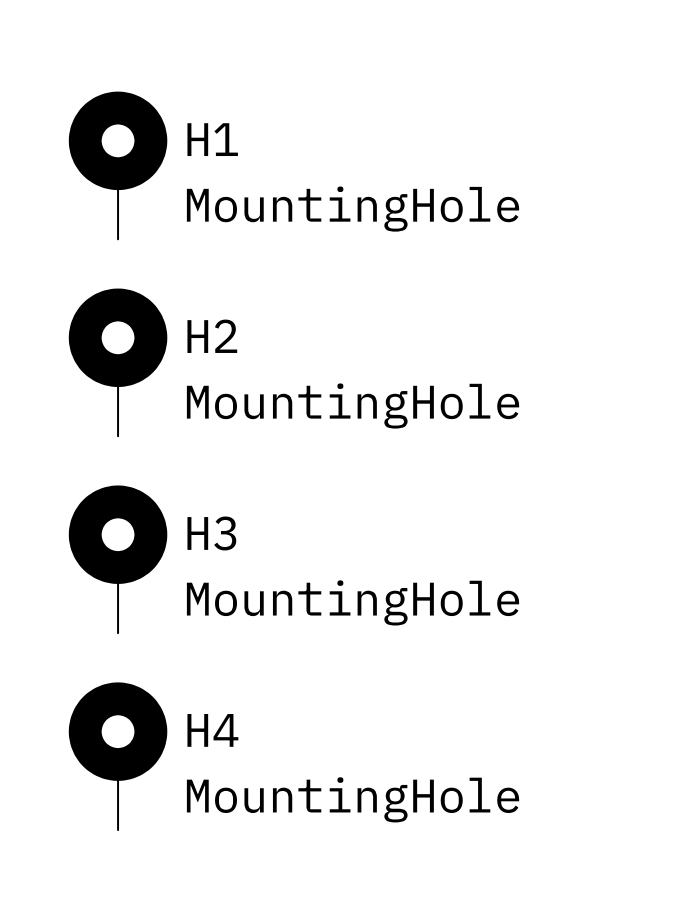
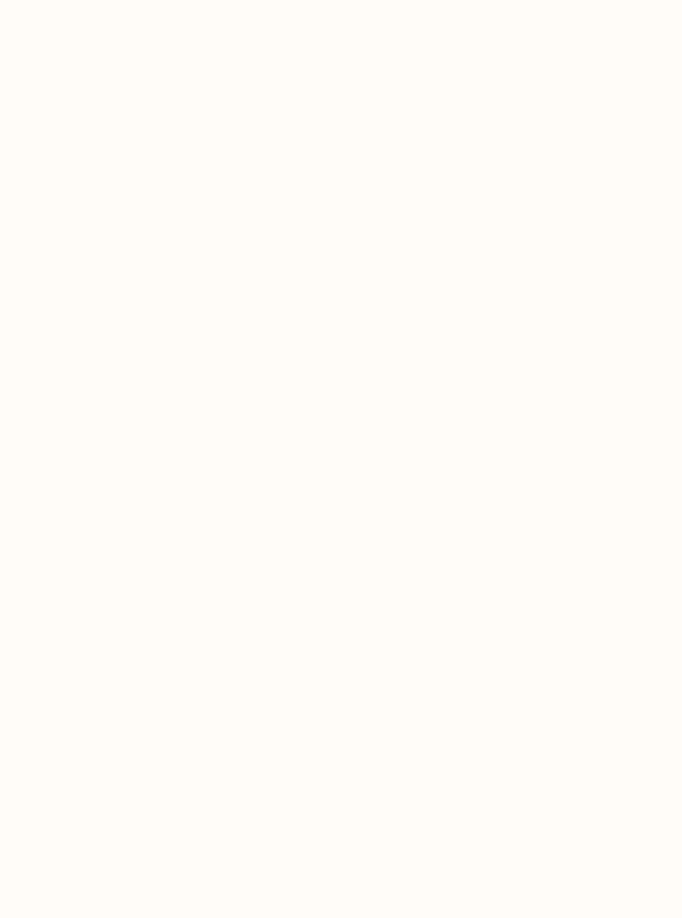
H1: MountingHole (118, 165) -> none
H2: MountingHole (118, 362) -> none
H3: MountingHole (118, 559) -> none
H4: MountingHole (118, 756) -> none

